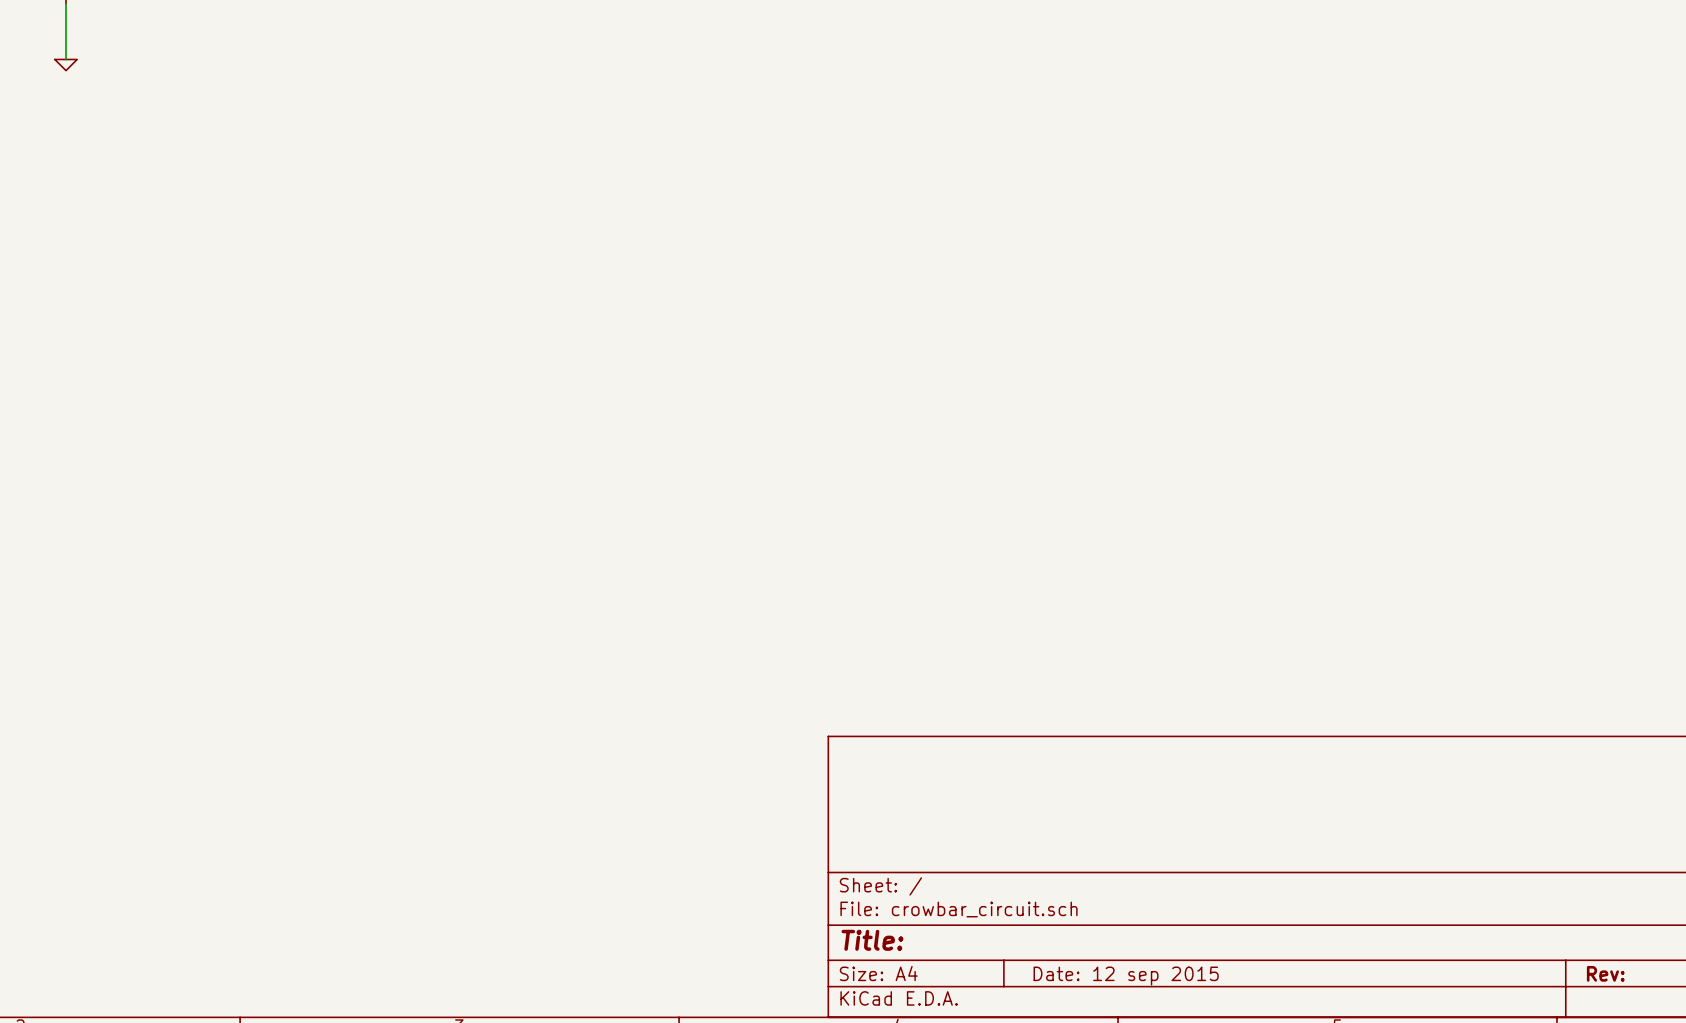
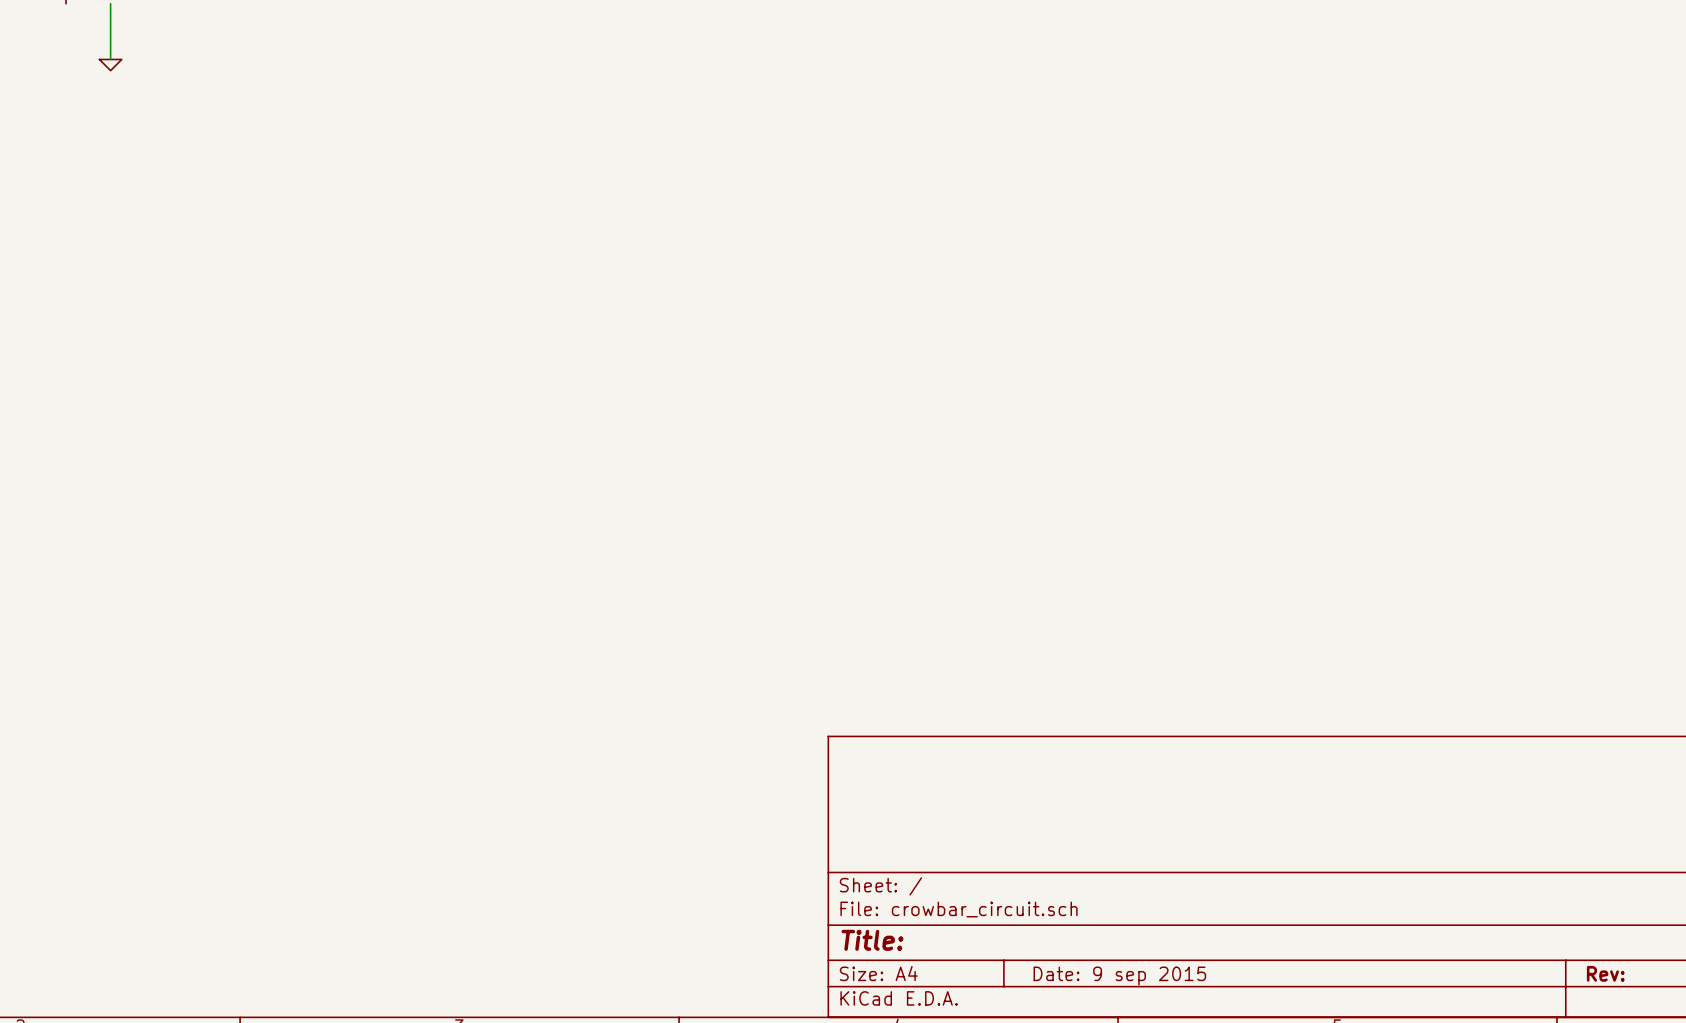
wire: (66, 3) (66, 59) -> (110, 3) (110, 59)
power symbol position: (66, 65) -> (110, 65)
title block: Date: 12 sep 2015 (1126, 976) -> Date: 9 sep 2015 (1119, 976)

